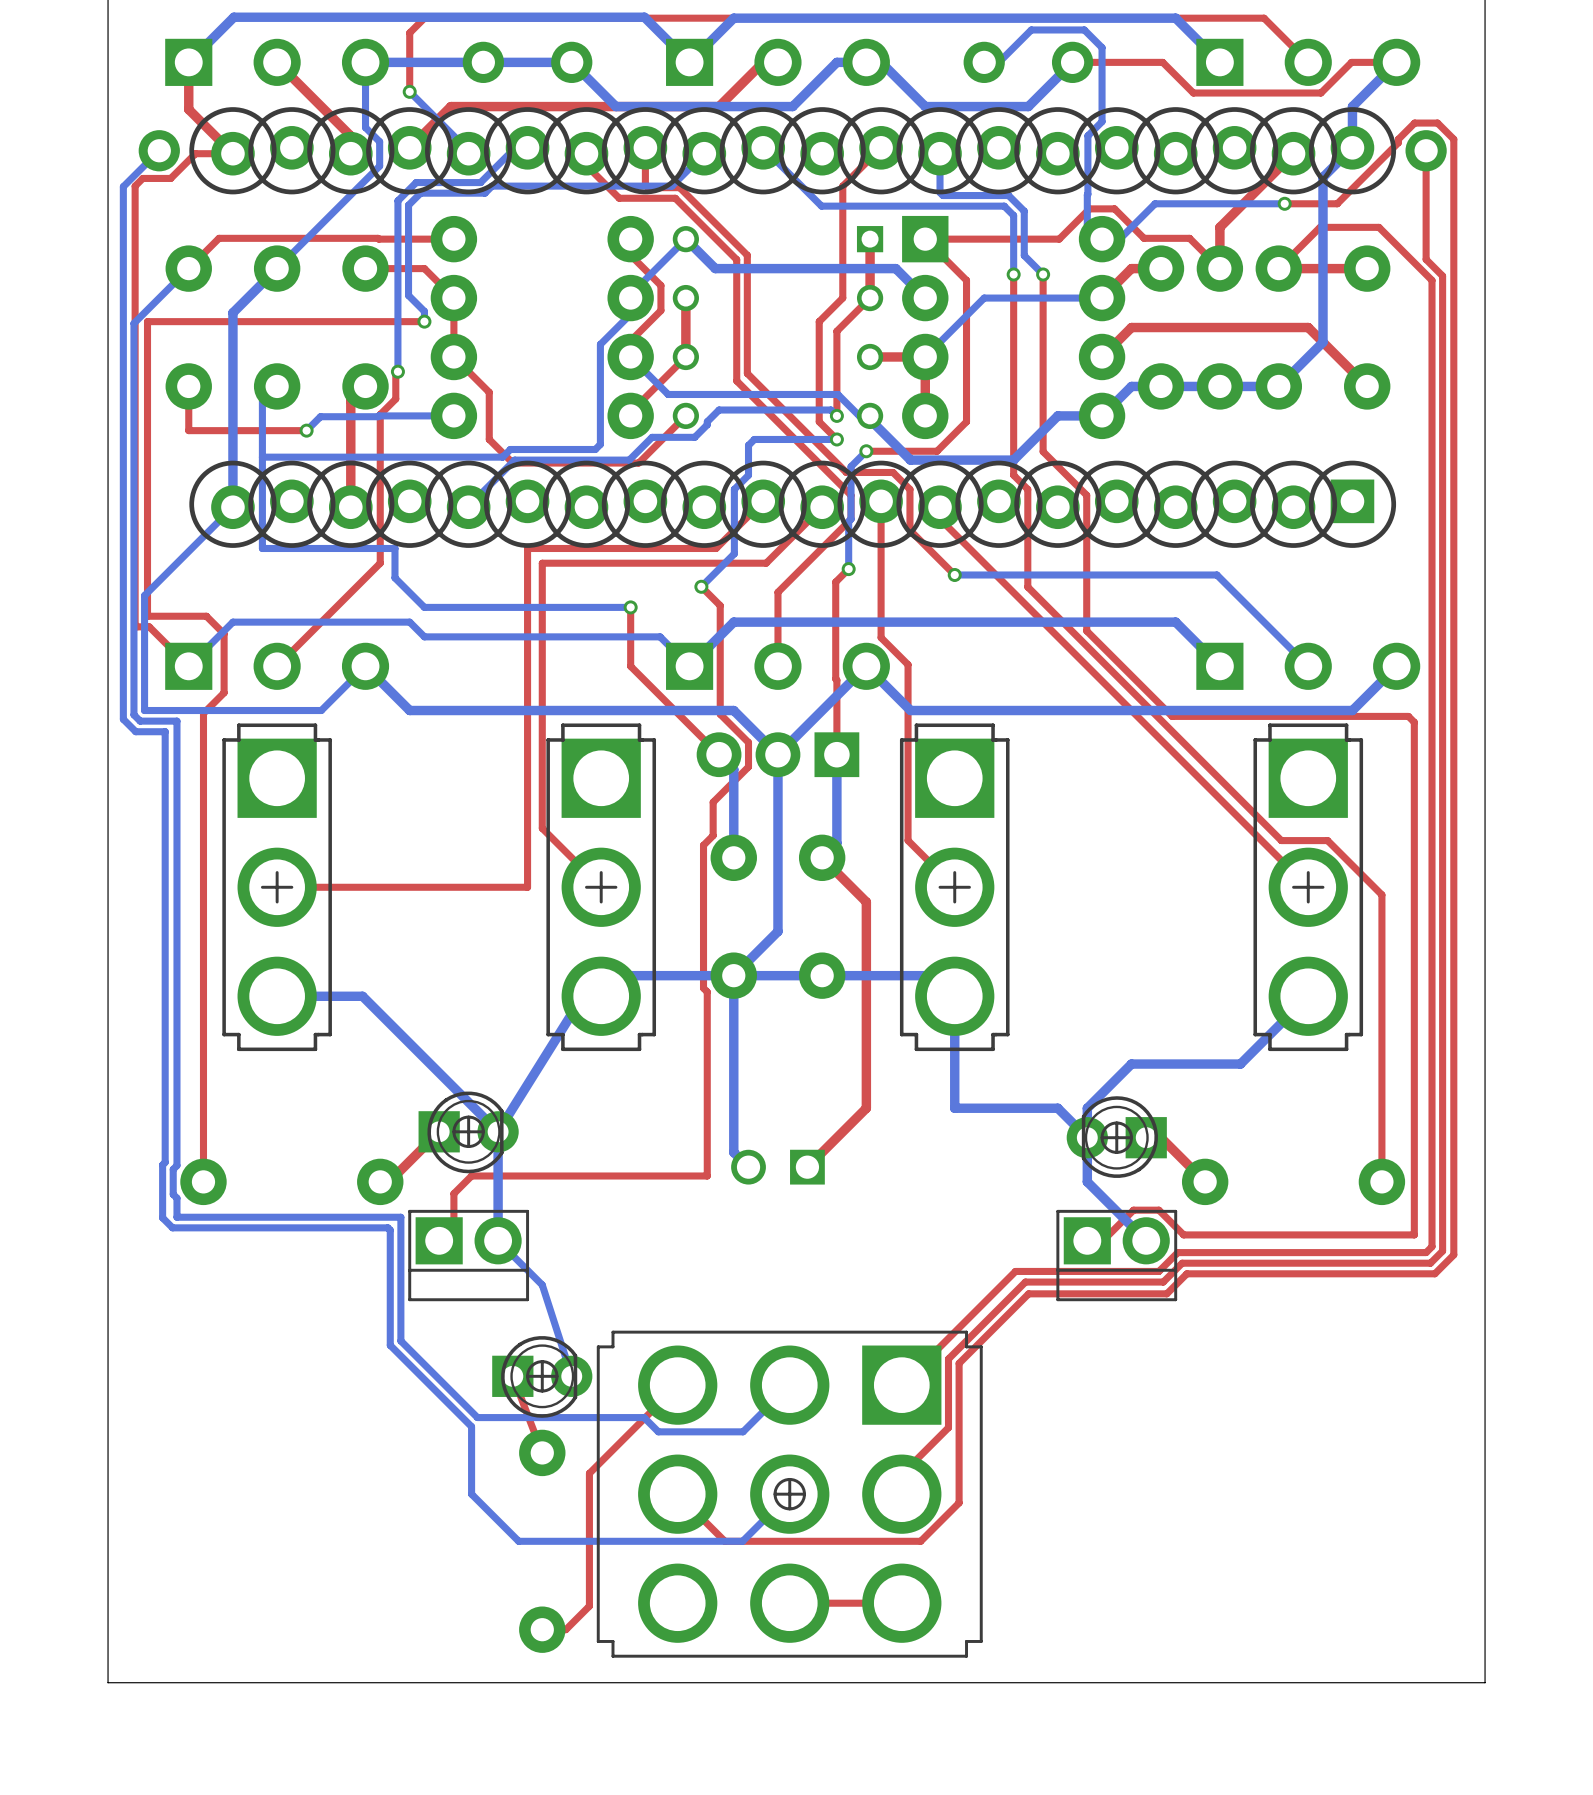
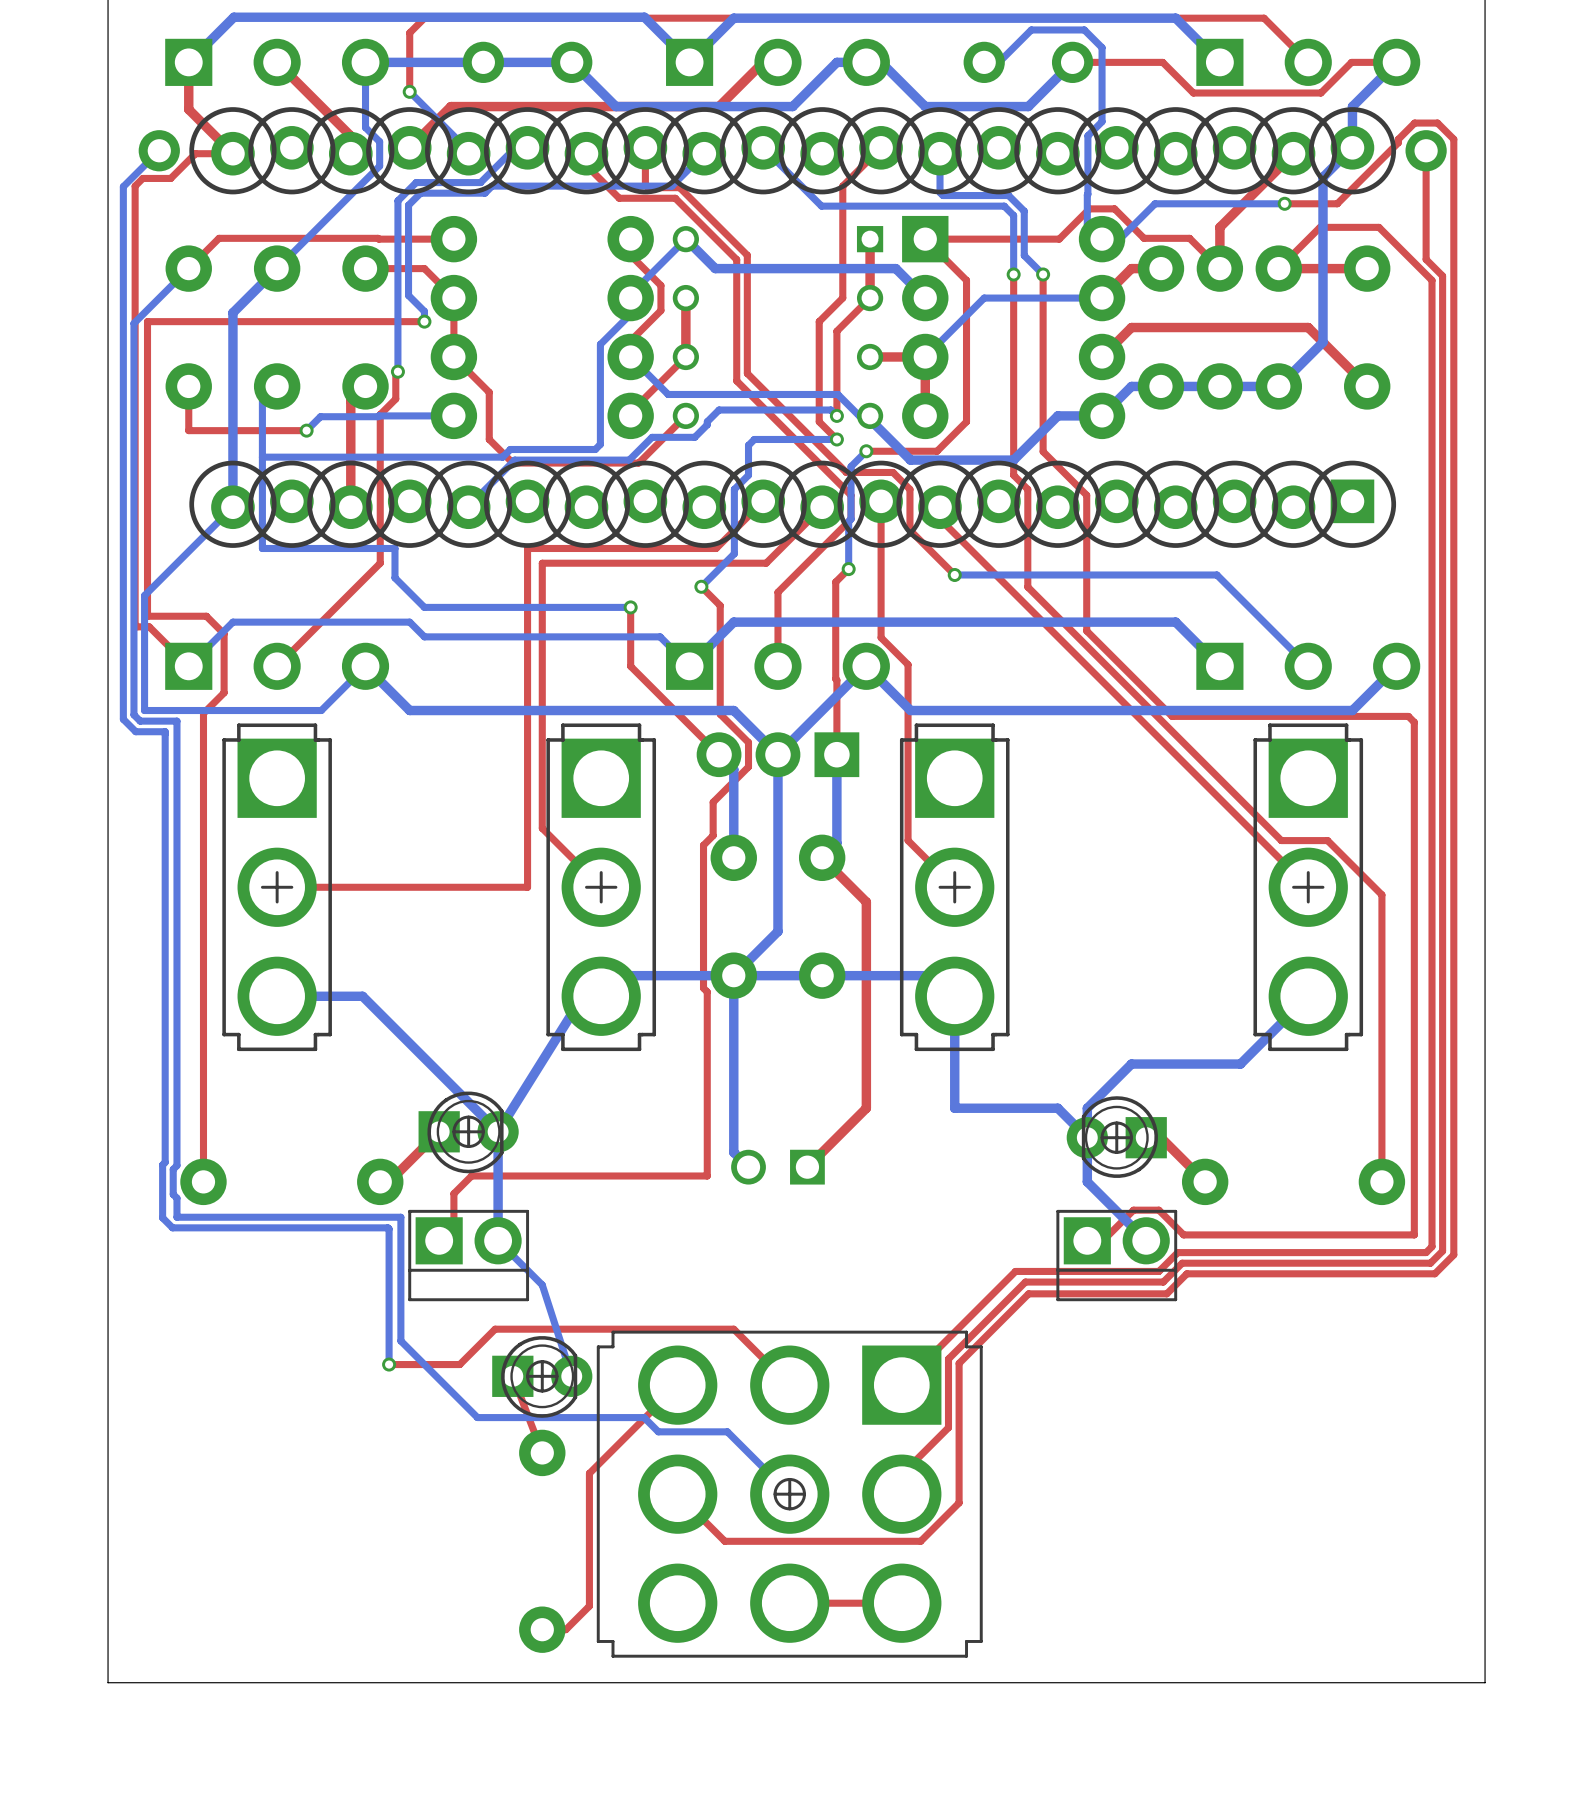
bottom track: (389, 1229) (390, 1345) (471, 1426) (471, 1494) (518, 1541) (742, 1541) (789, 1494) -> (389, 1229) (389, 1364)
top track: none -> (389, 1364) (459, 1364) (495, 1329) (733, 1329) (789, 1385)
via: none -> (389, 1364)
bottom track: (789, 1385) (743, 1431) (727, 1431) -> (789, 1494) (727, 1431)

